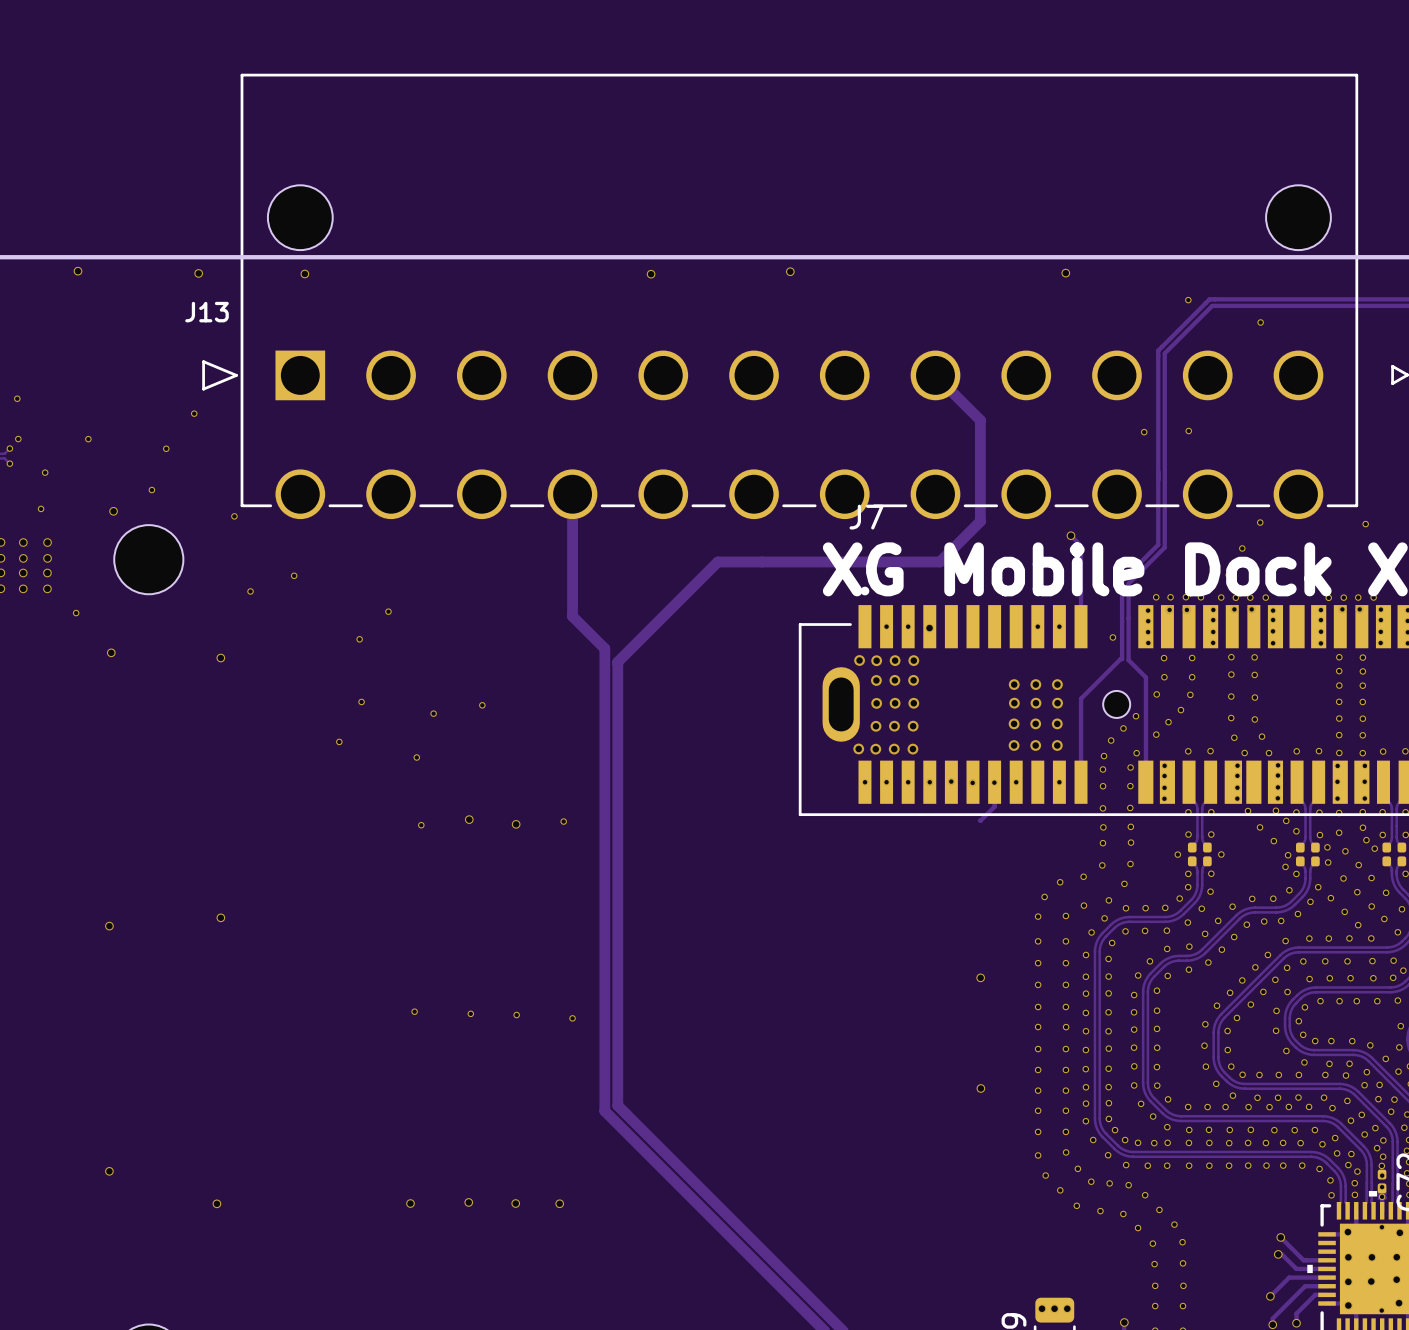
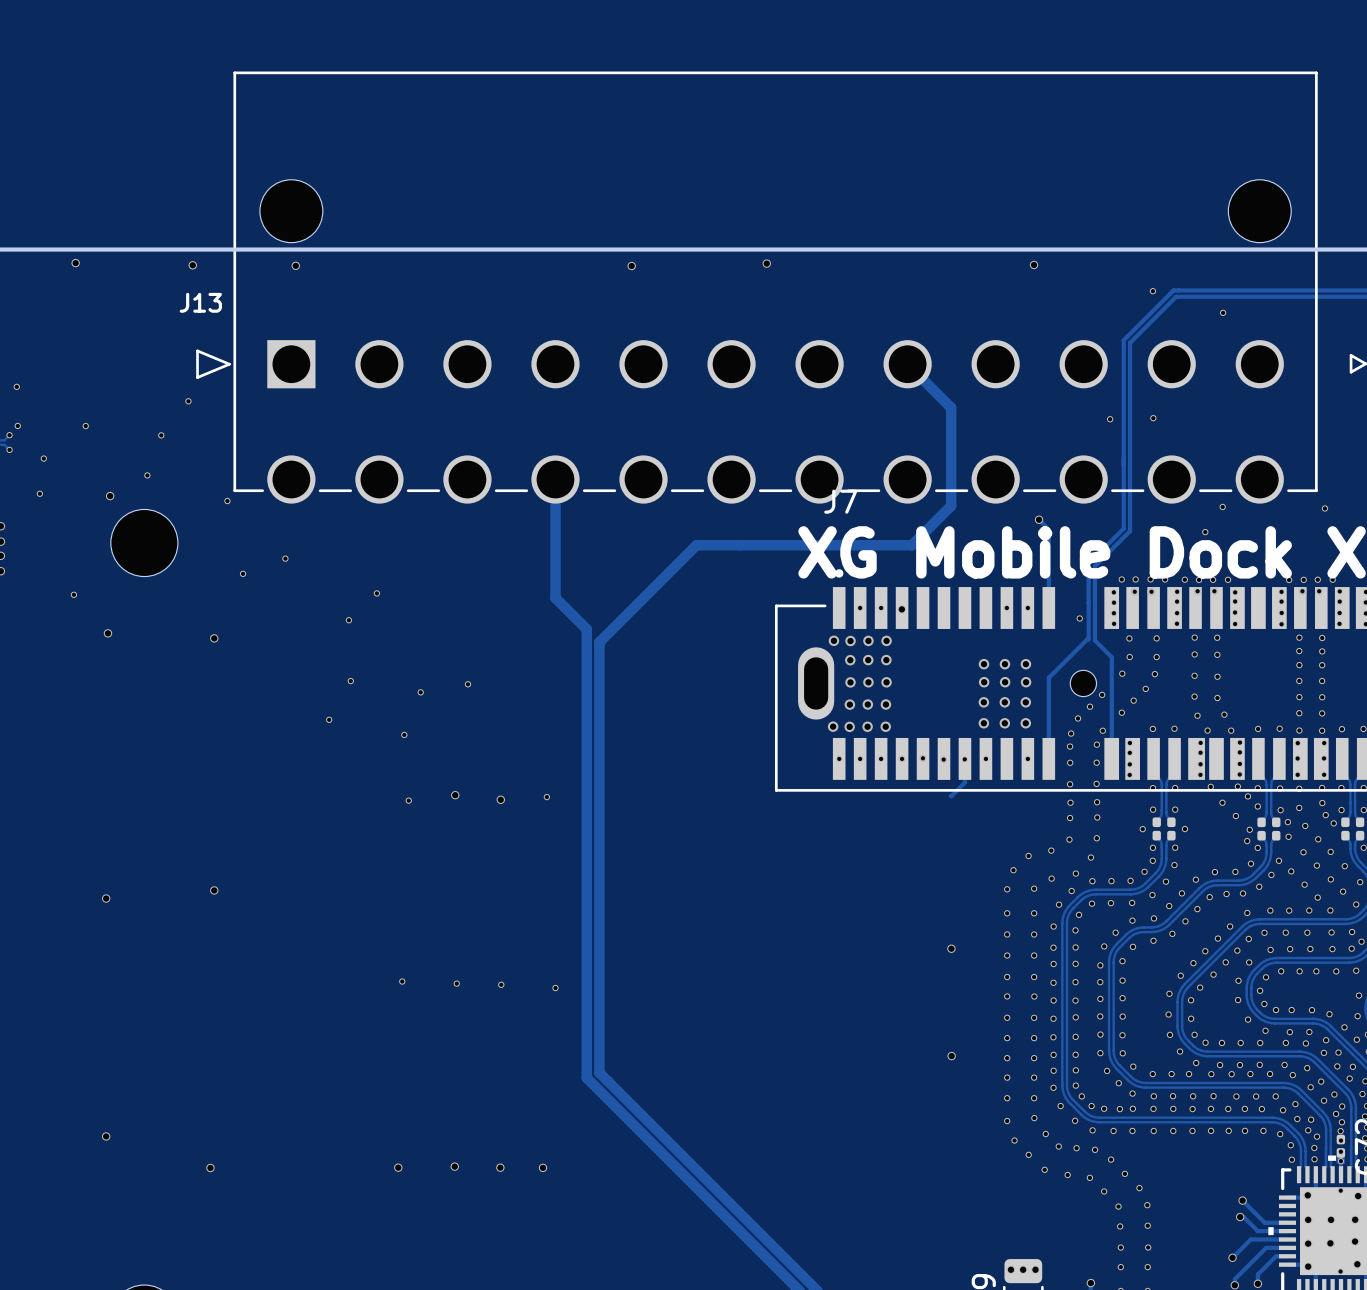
via: (23, 542) -> none
via: (47, 542) -> none
via: (23, 558) -> none
via: (47, 558) -> none
via: (23, 572) -> none
via: (47, 572) -> none
via: (23, 588) -> none
via: (47, 588) -> none

